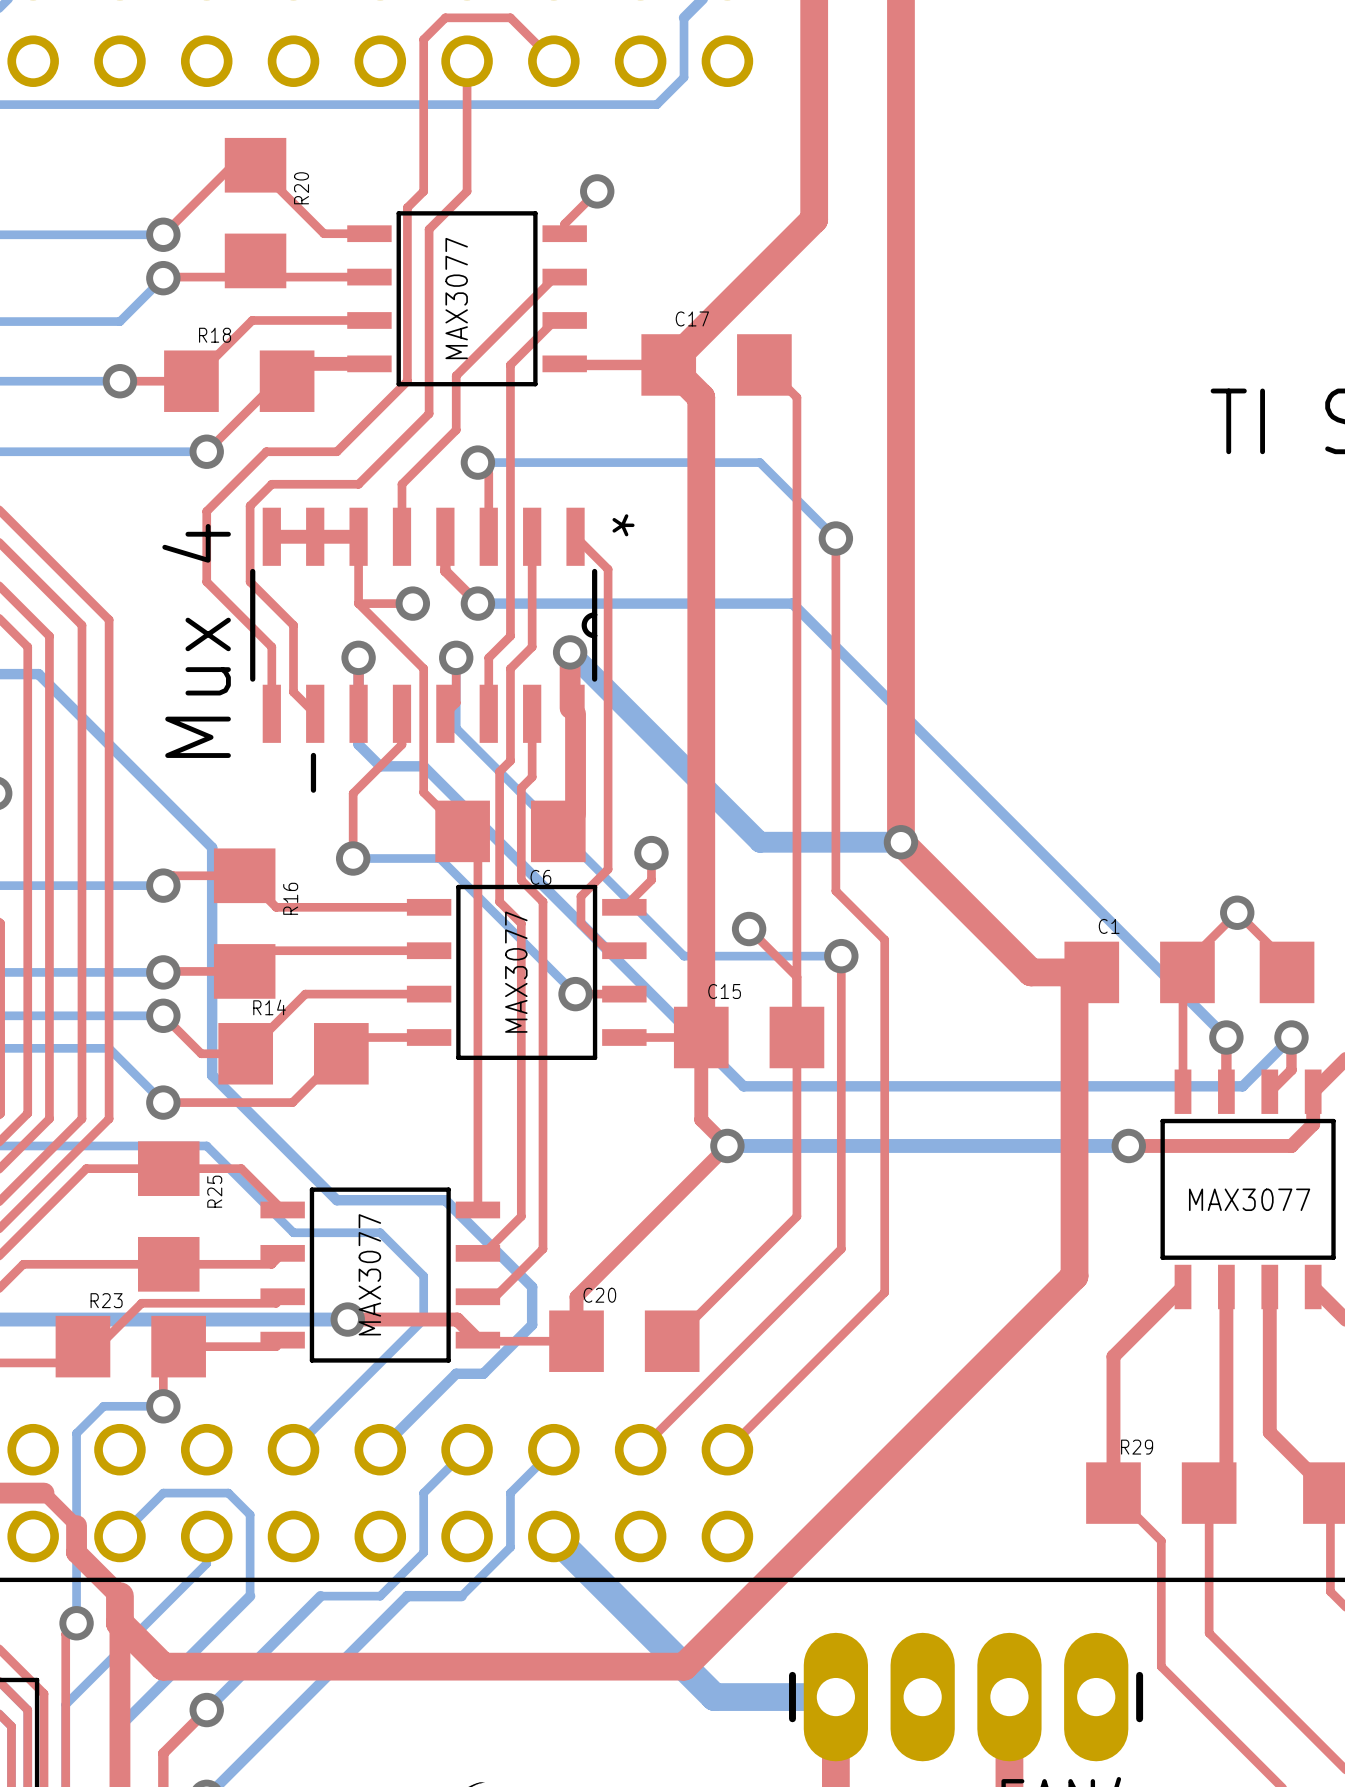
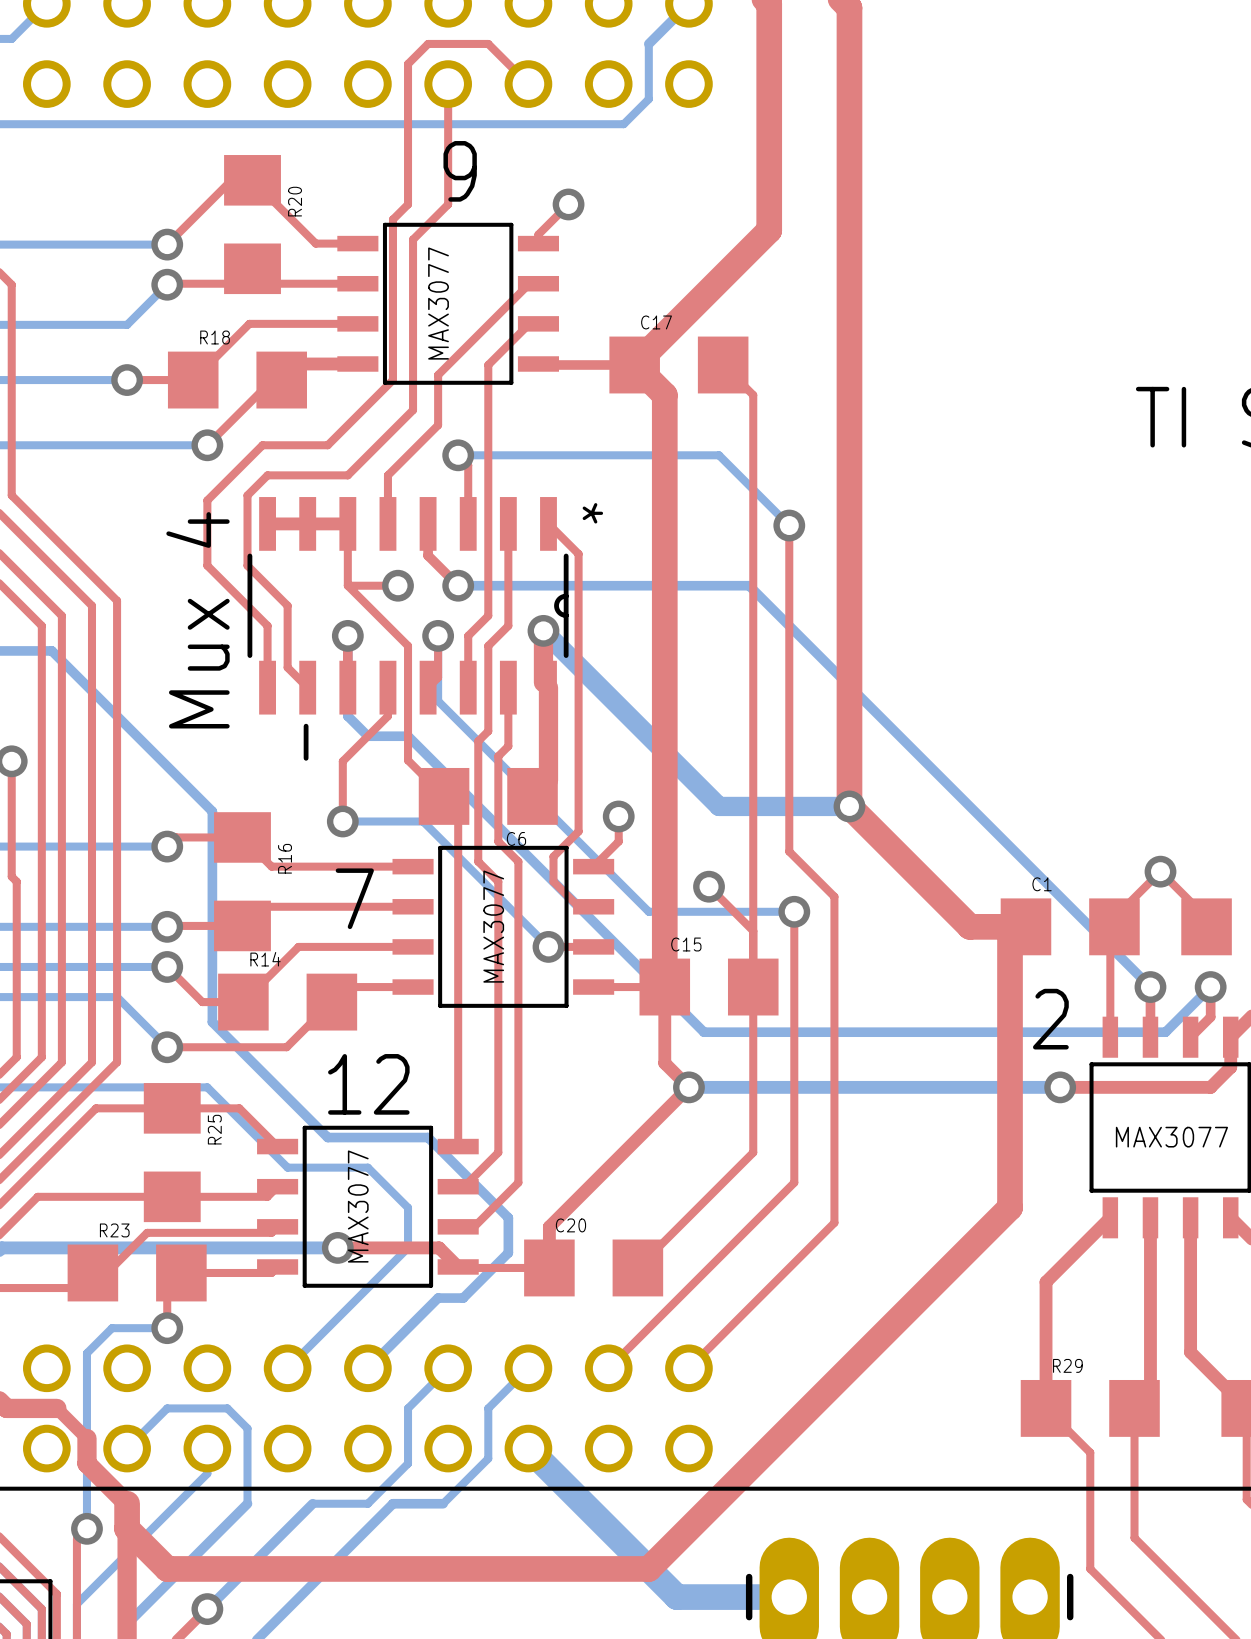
text: none -> 9 (460, 171)
text: none -> 7 (354, 898)
text: none -> 2 (1050, 1019)
text: none -> 12 (368, 1084)

